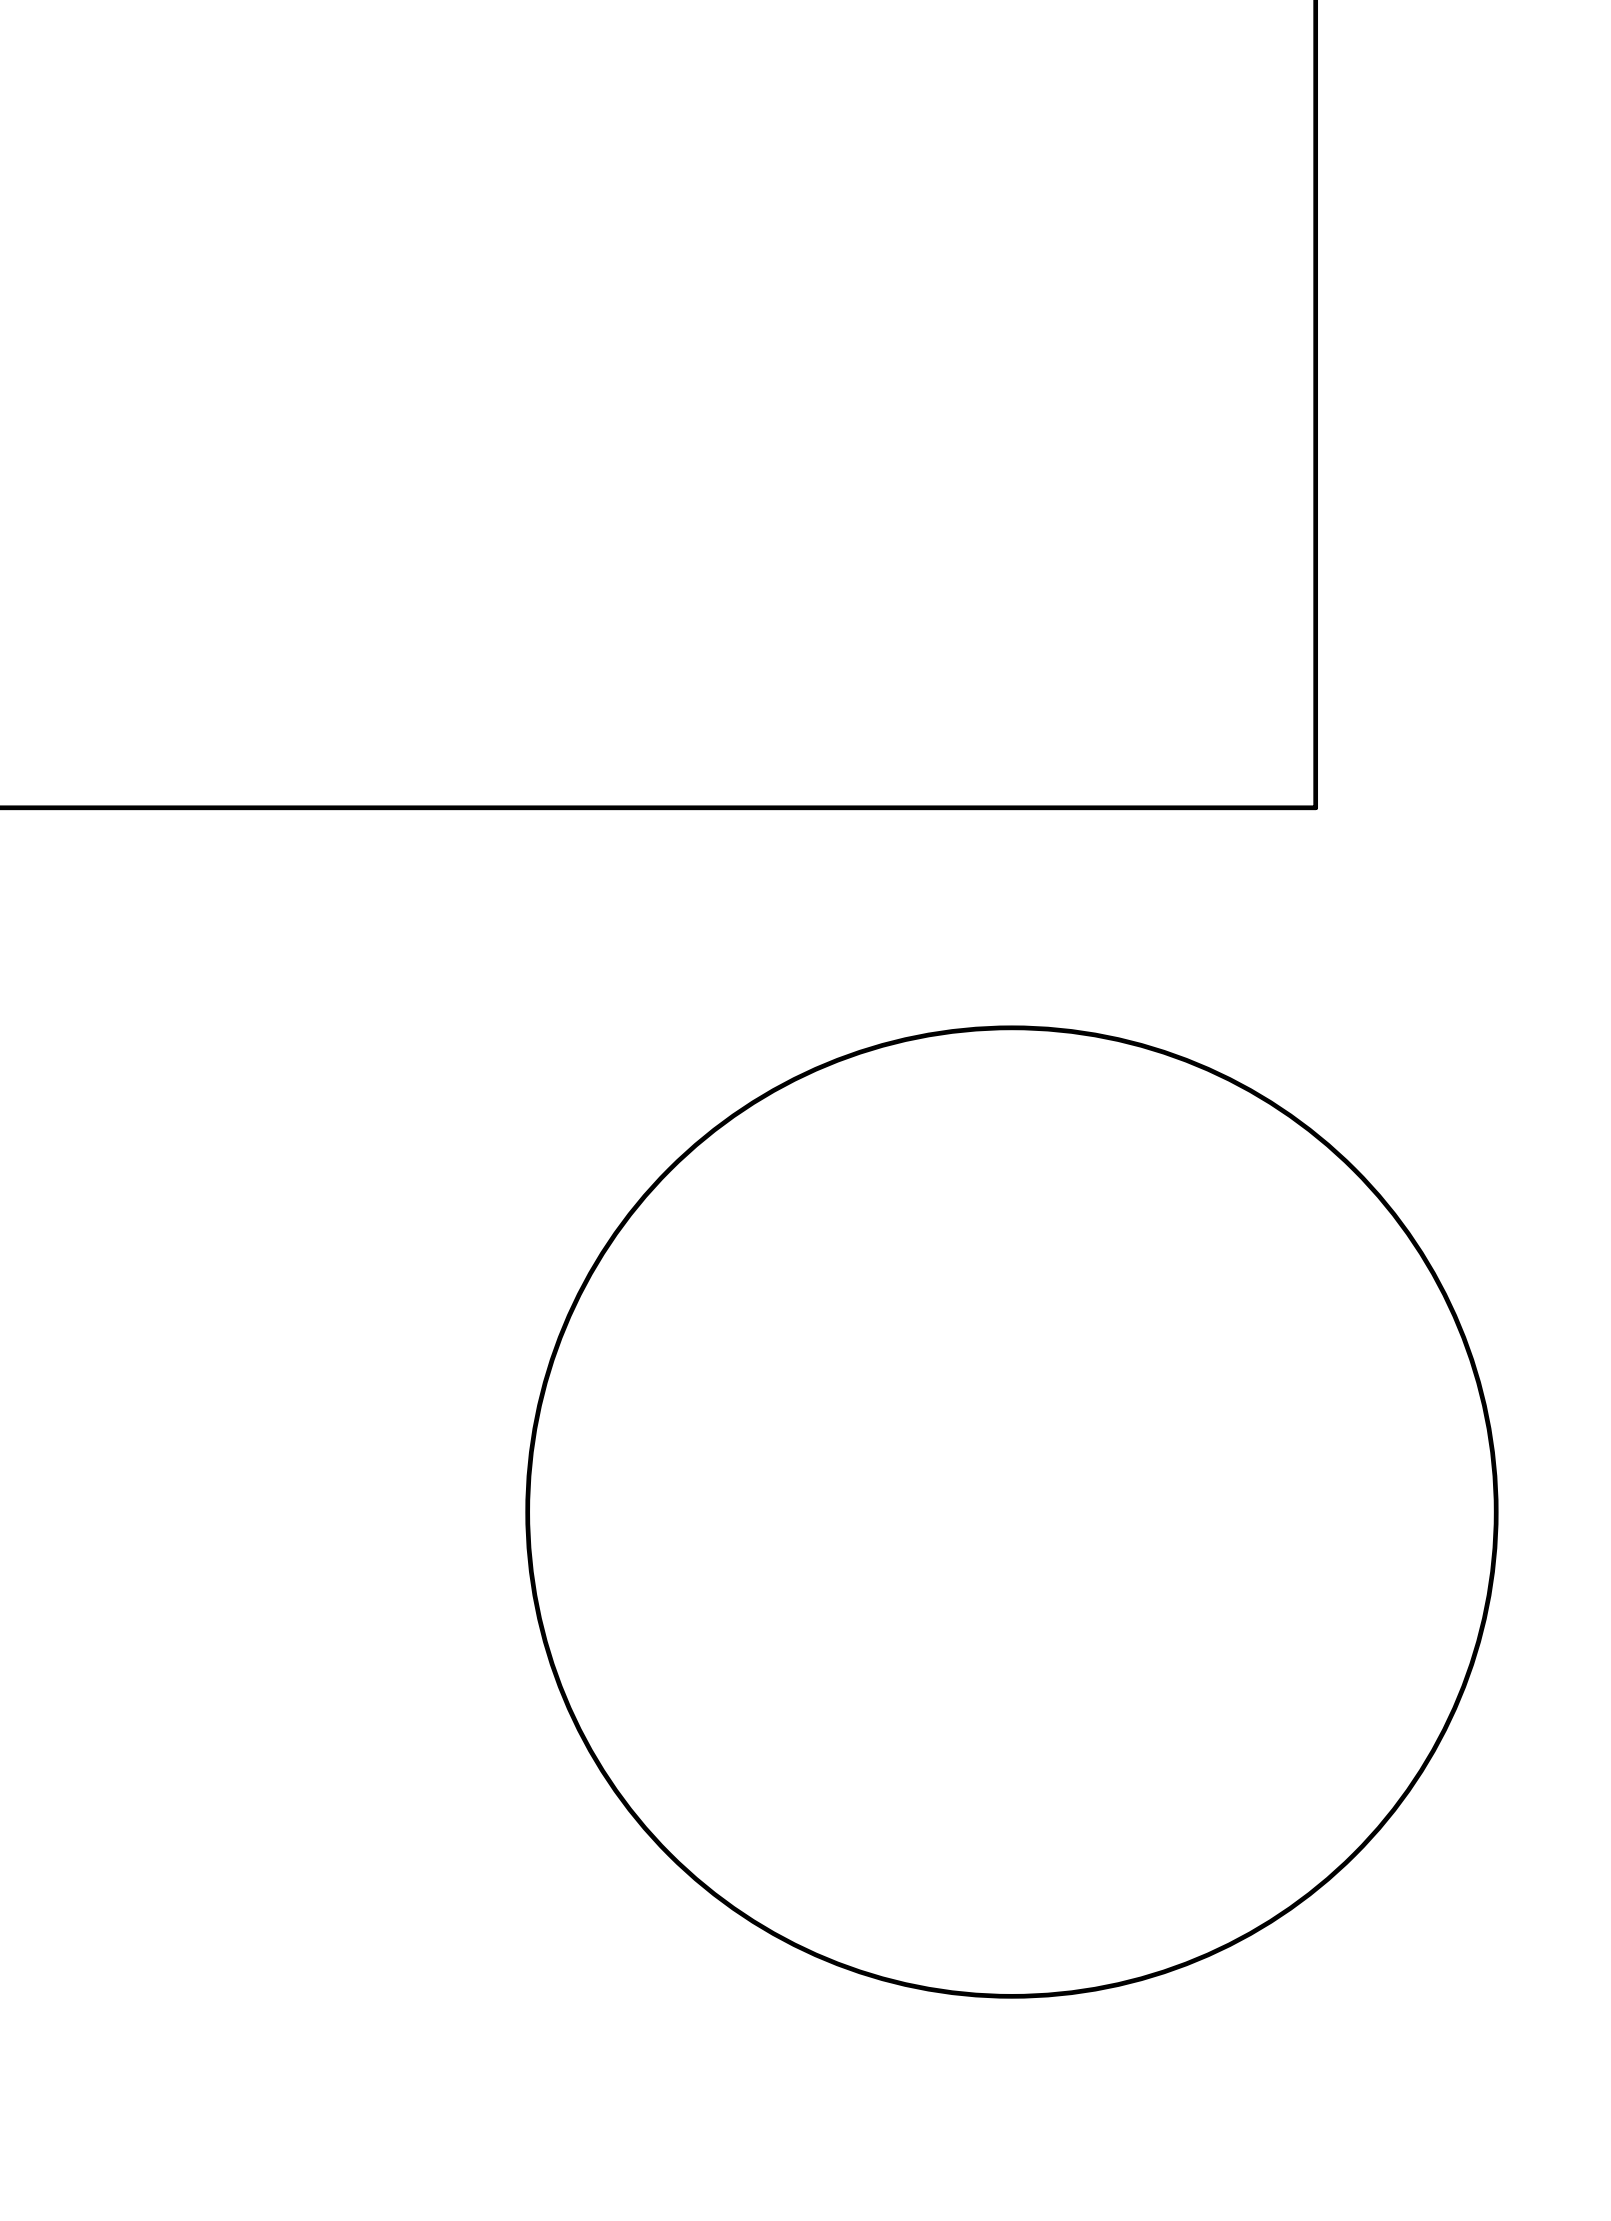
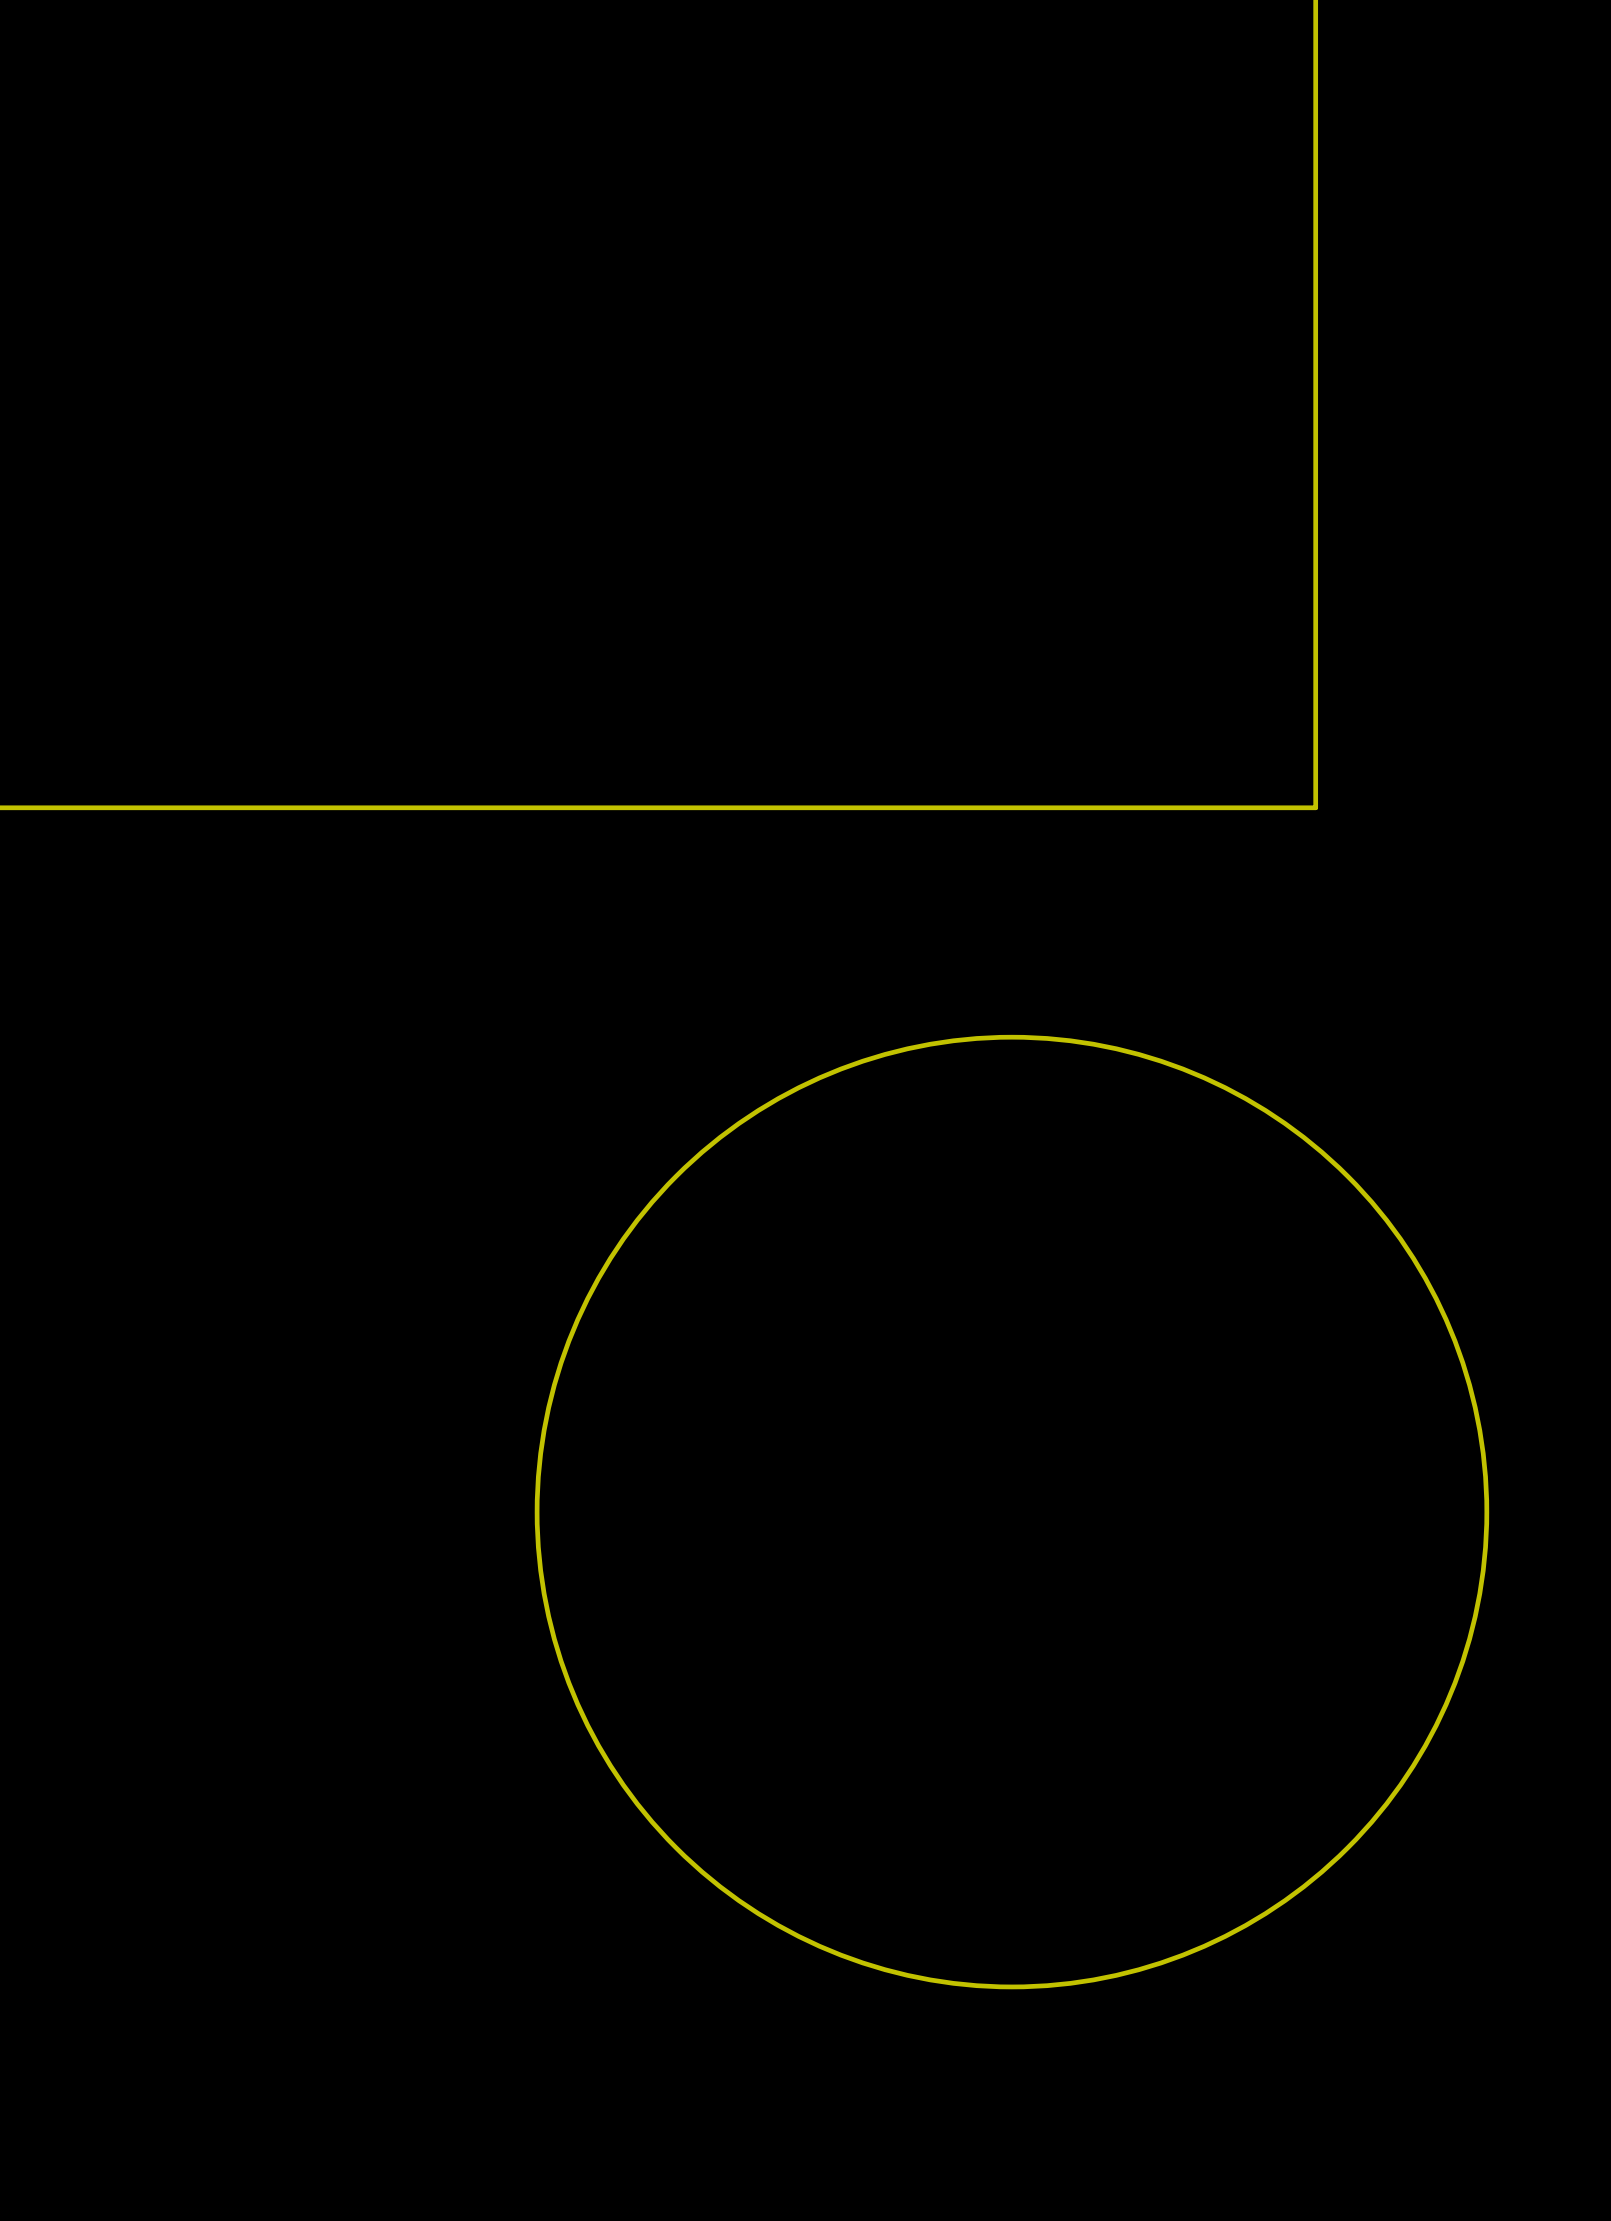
round board edge size: [525, 1025, 1499, 1999] -> [534, 1034, 1490, 1990]

